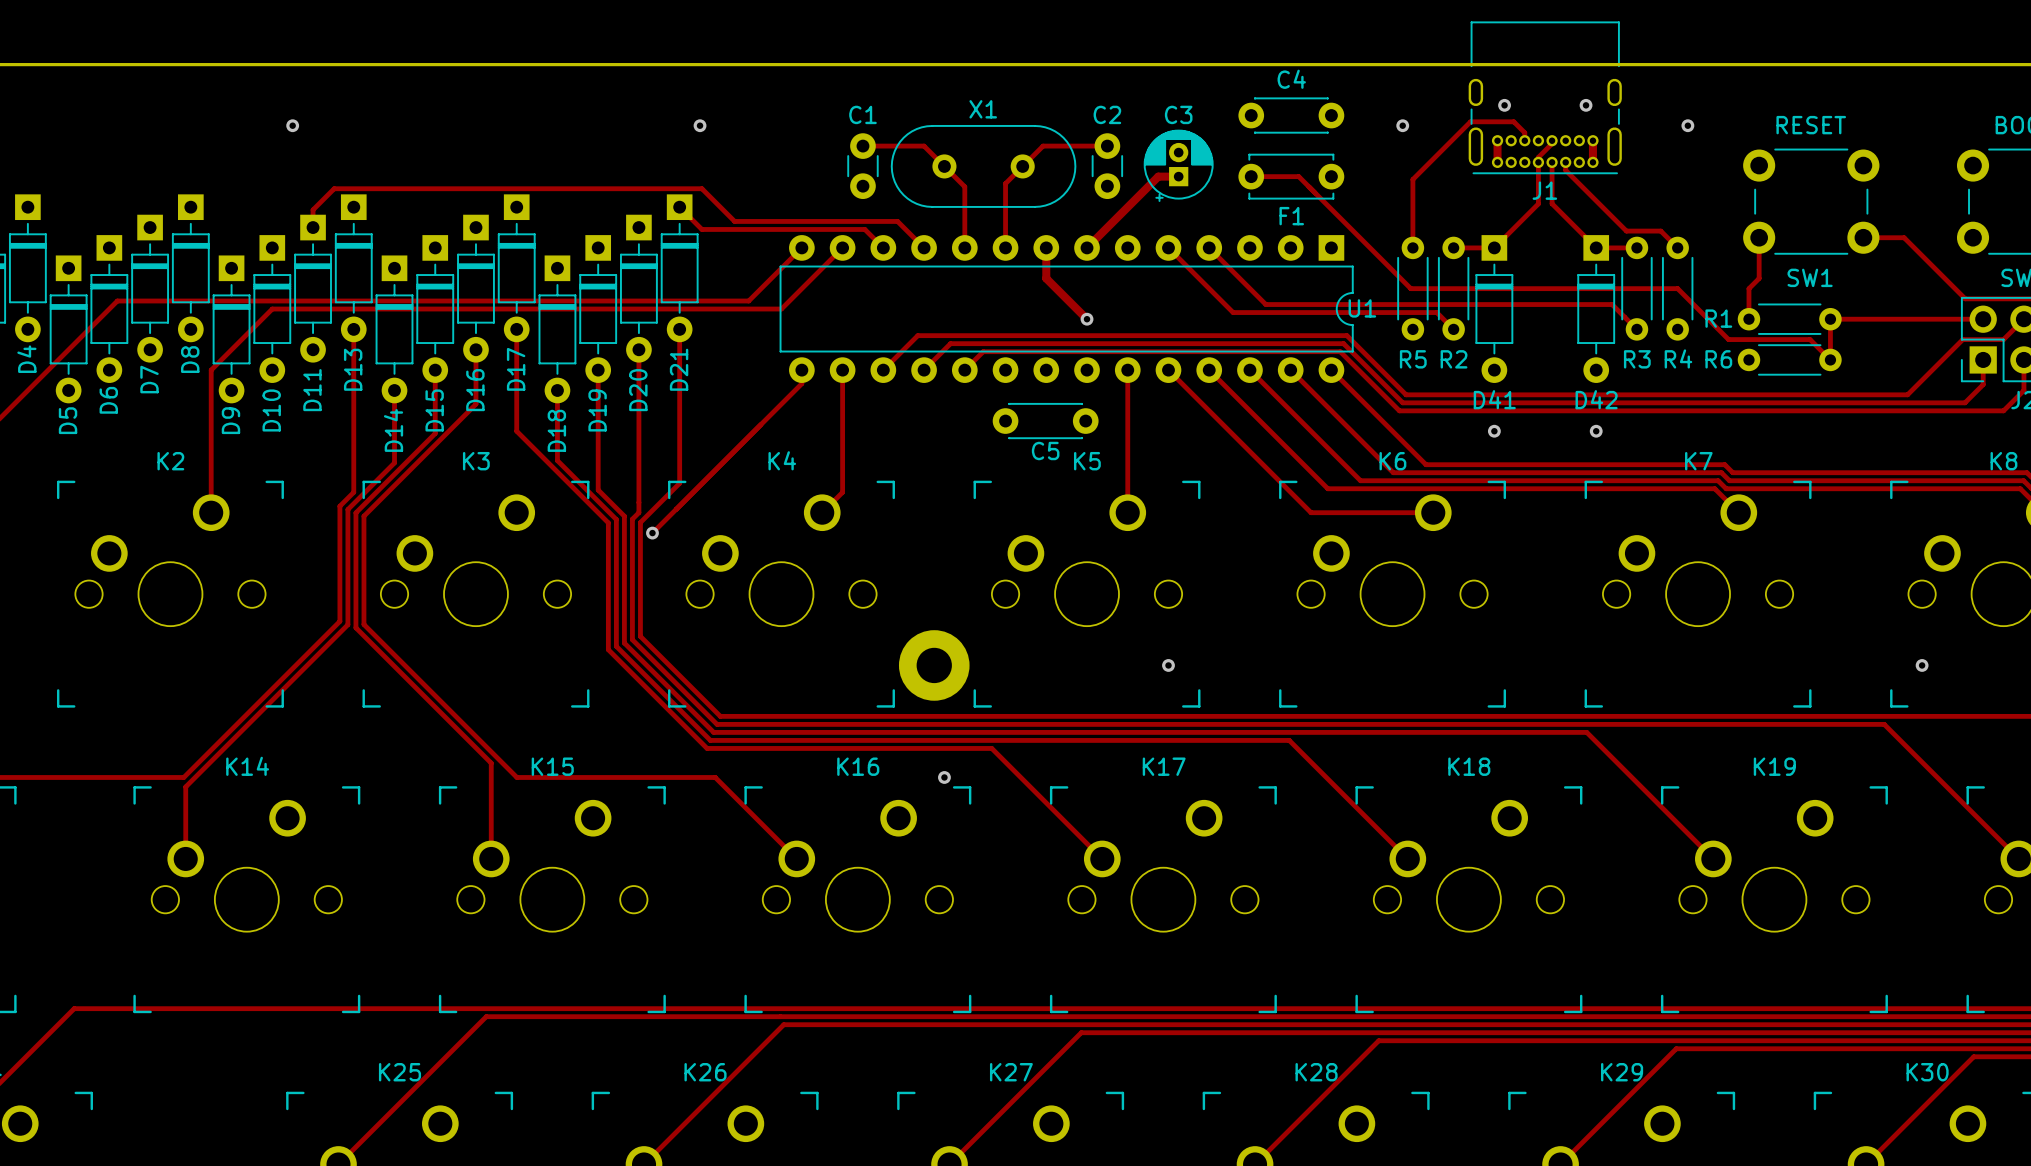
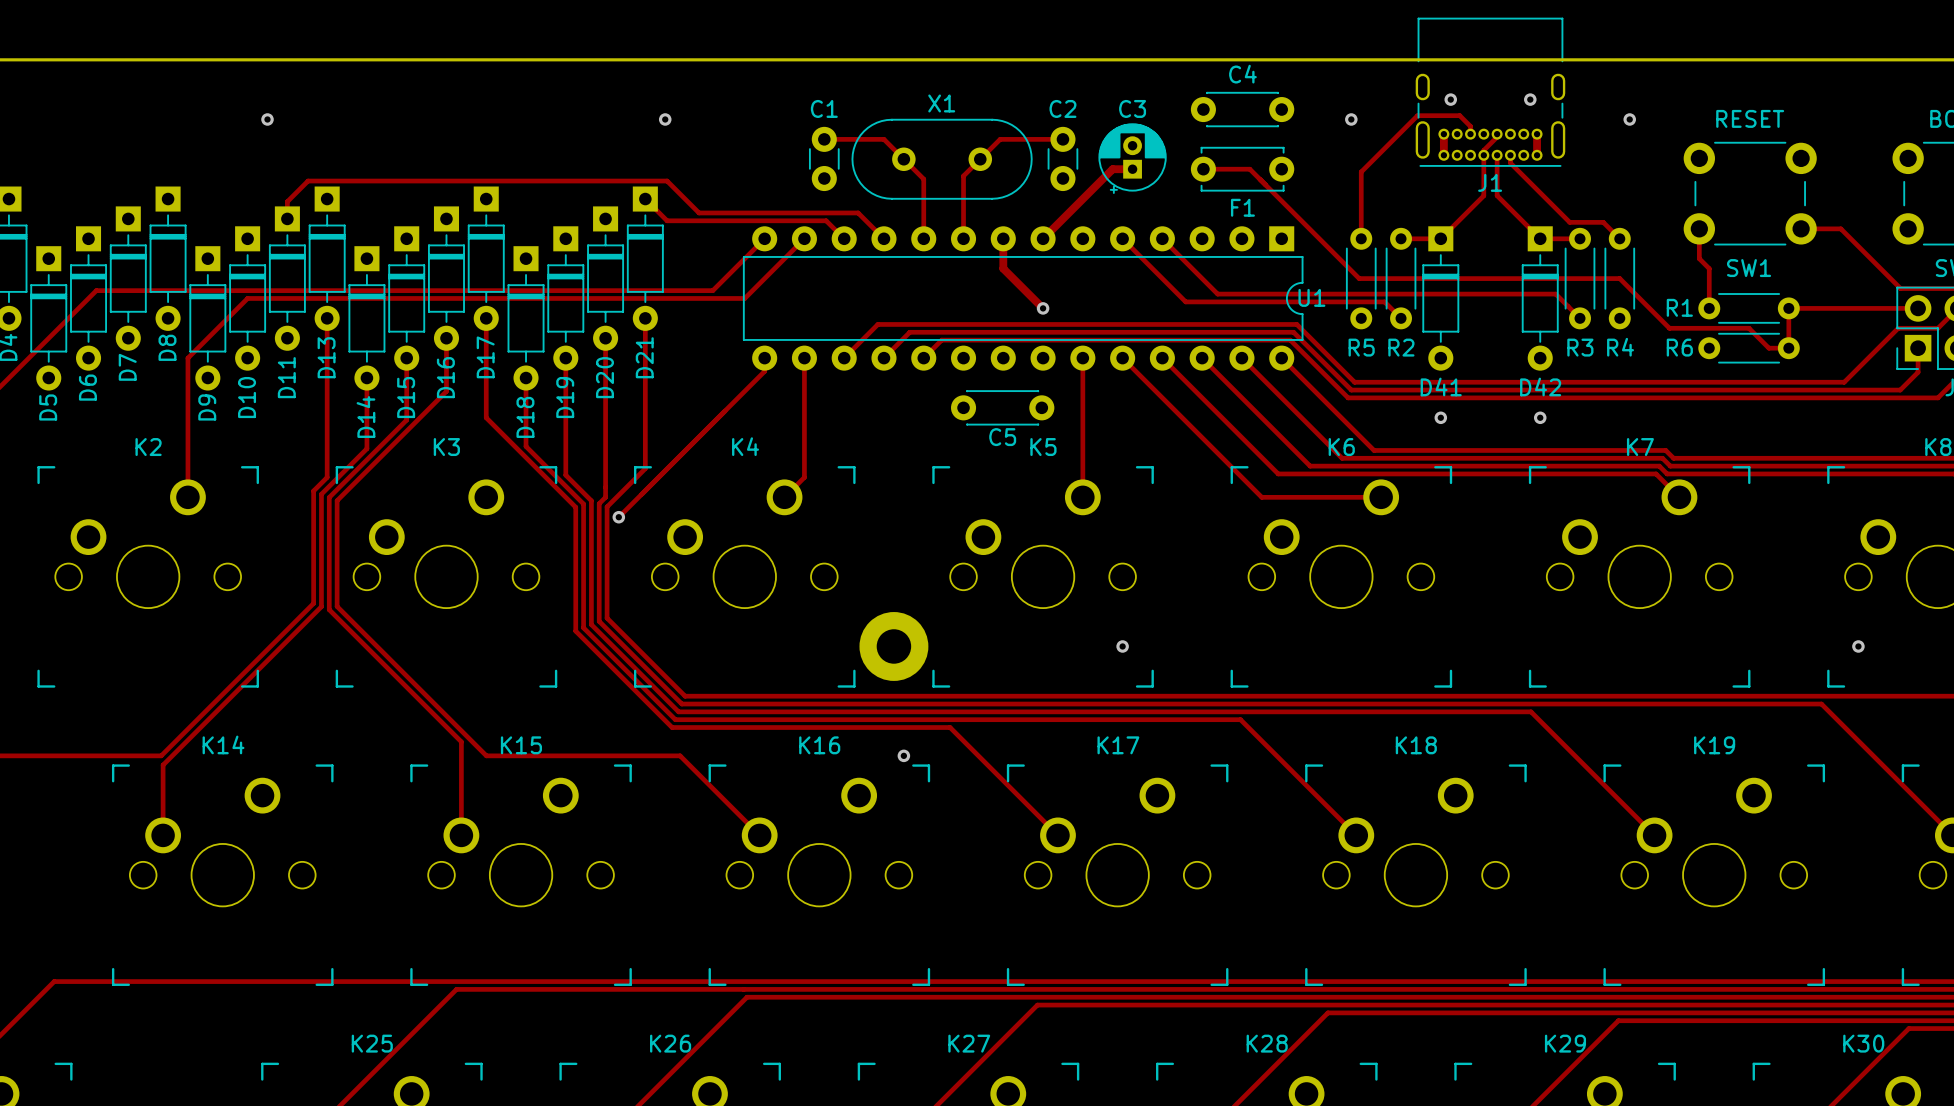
track: (1759, 268) (1759, 278) (1748, 288) (1748, 319) -> (1699, 258) (1709, 268) (1709, 308)
R1 position: (1789, 319) -> (1749, 308)
track: (1850, 319) (1830, 319) (1830, 359) -> (1788, 308) (1788, 348) (1768, 348)
R6 position: (1789, 359) -> (1749, 348)

